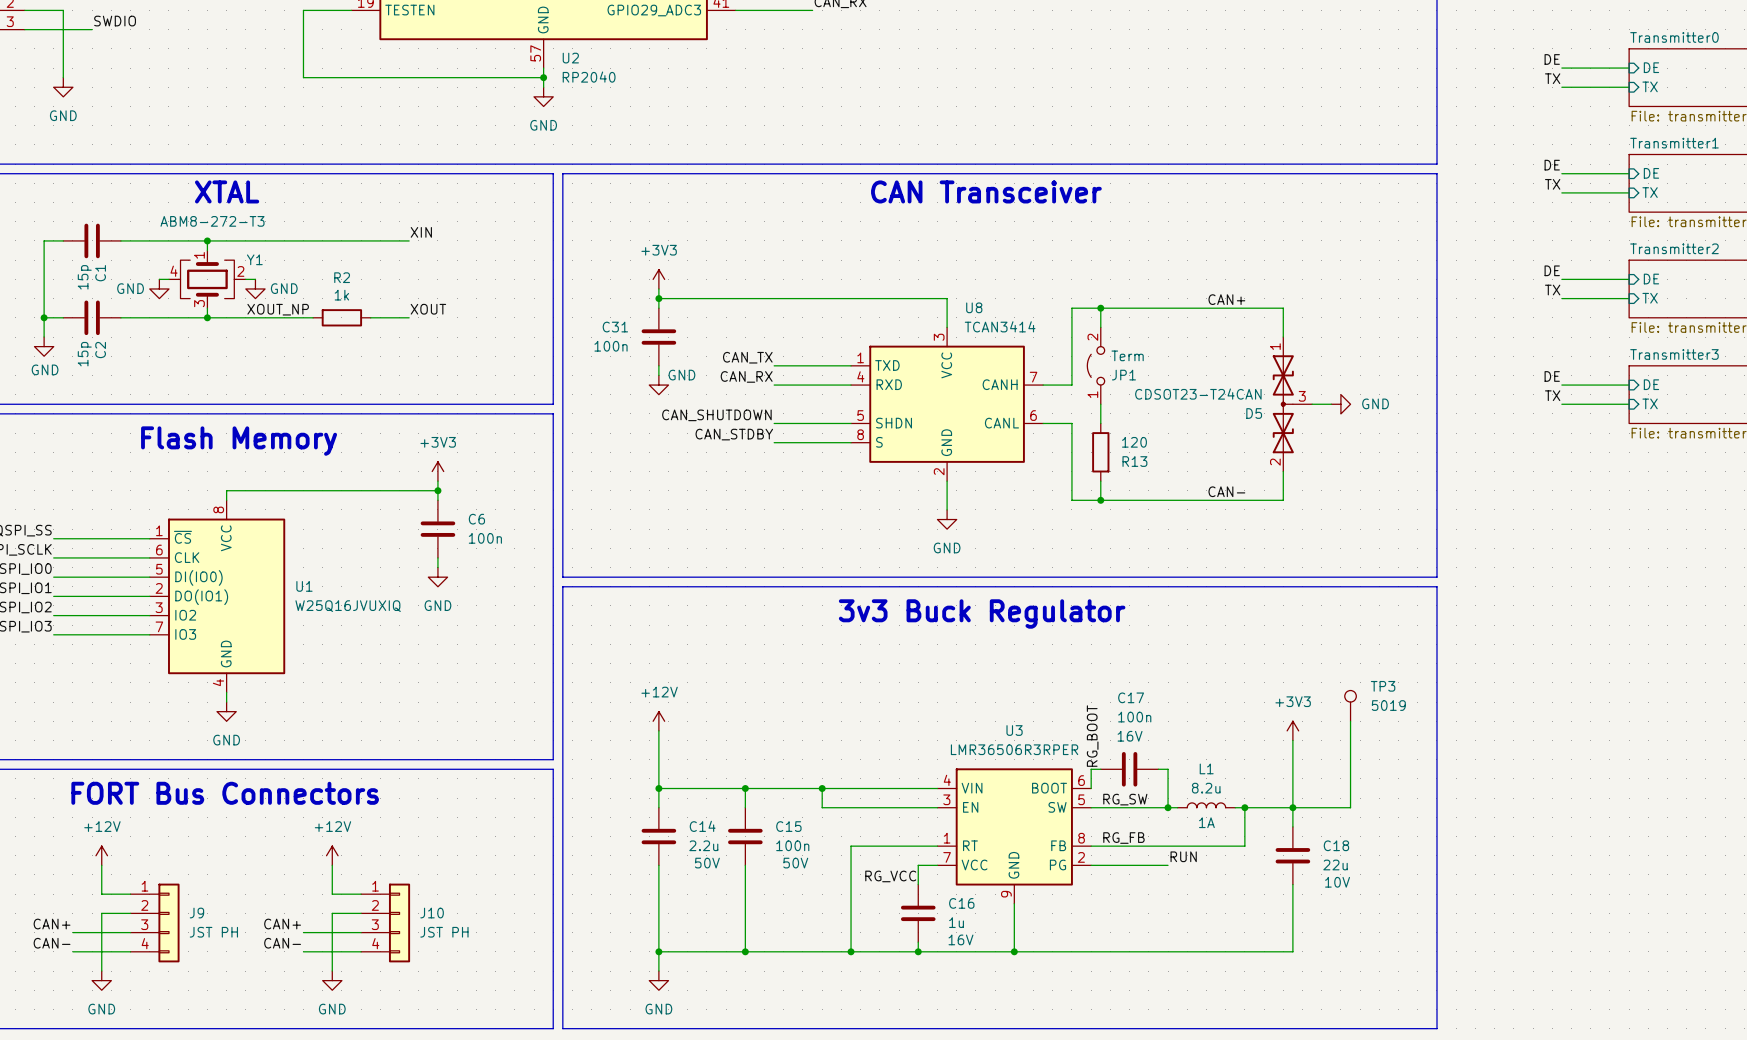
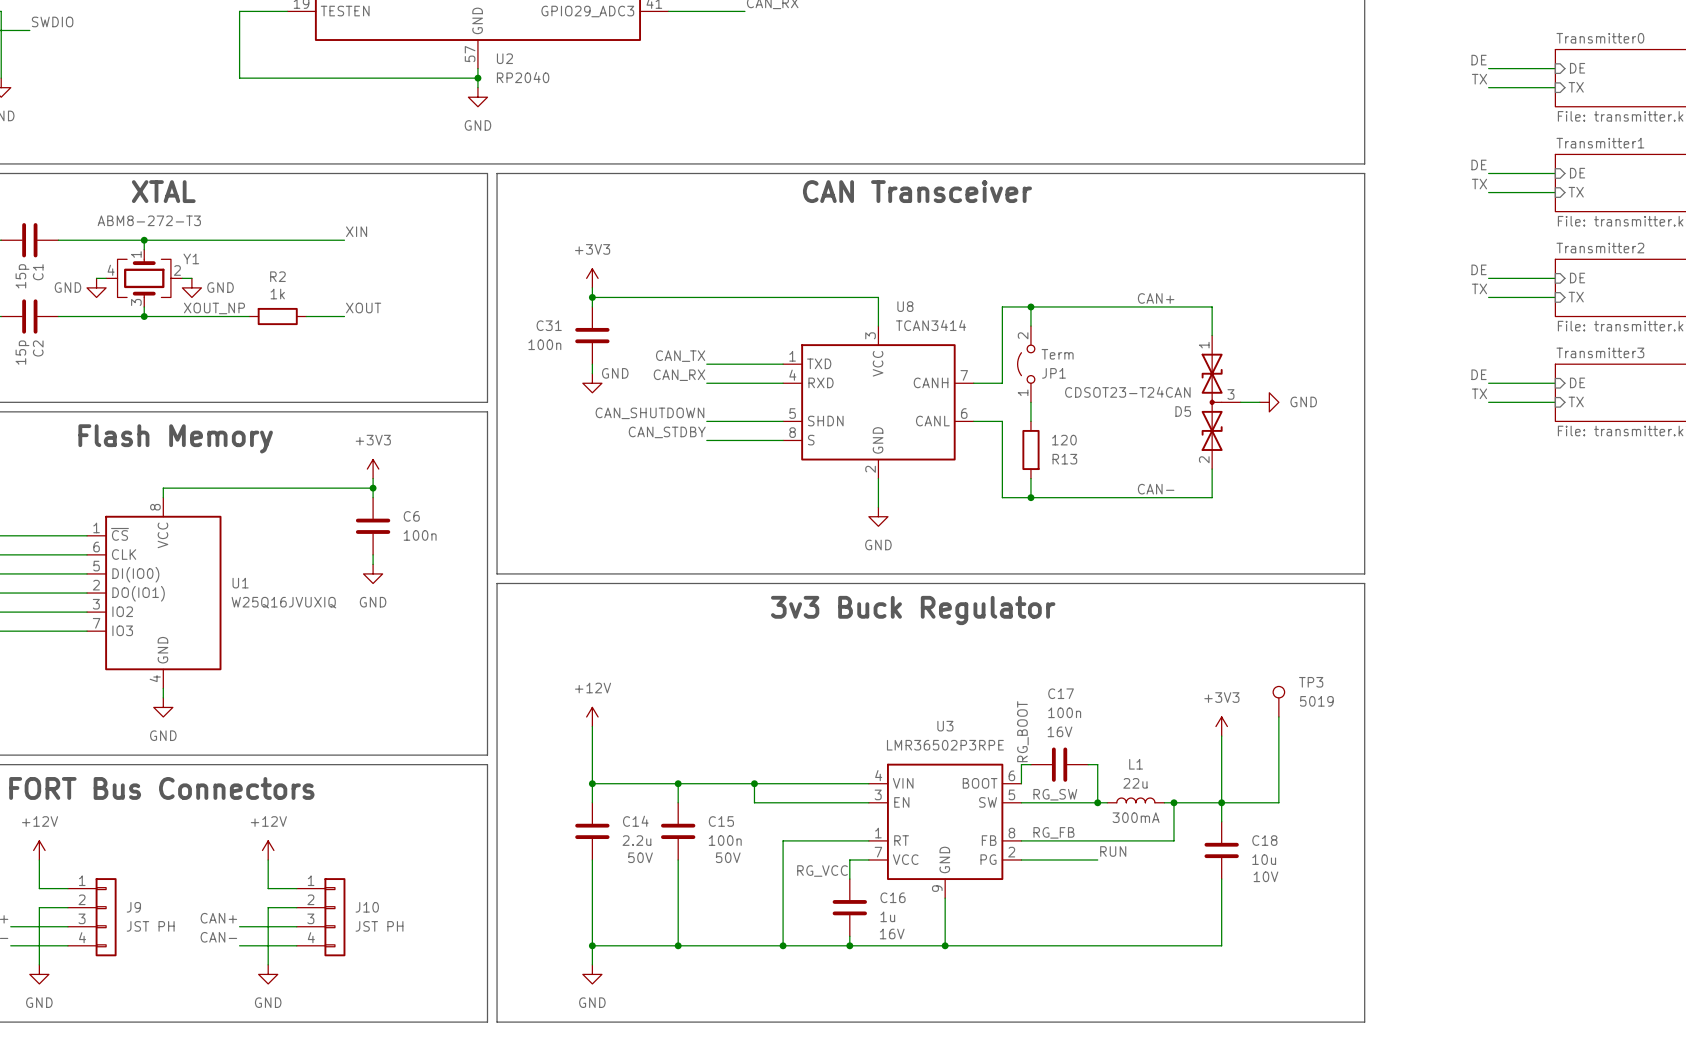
U3 value: LMR36506R3RPER (1014, 749) -> LMR36502P3RPE (945, 745)
L1 value: 8.2u (1206, 788) -> 22u (1135, 783)
L1 text: 1A (1206, 822) -> 300mA (1136, 817)
C18 value: 22u (1335, 864) -> 10u (1264, 859)

